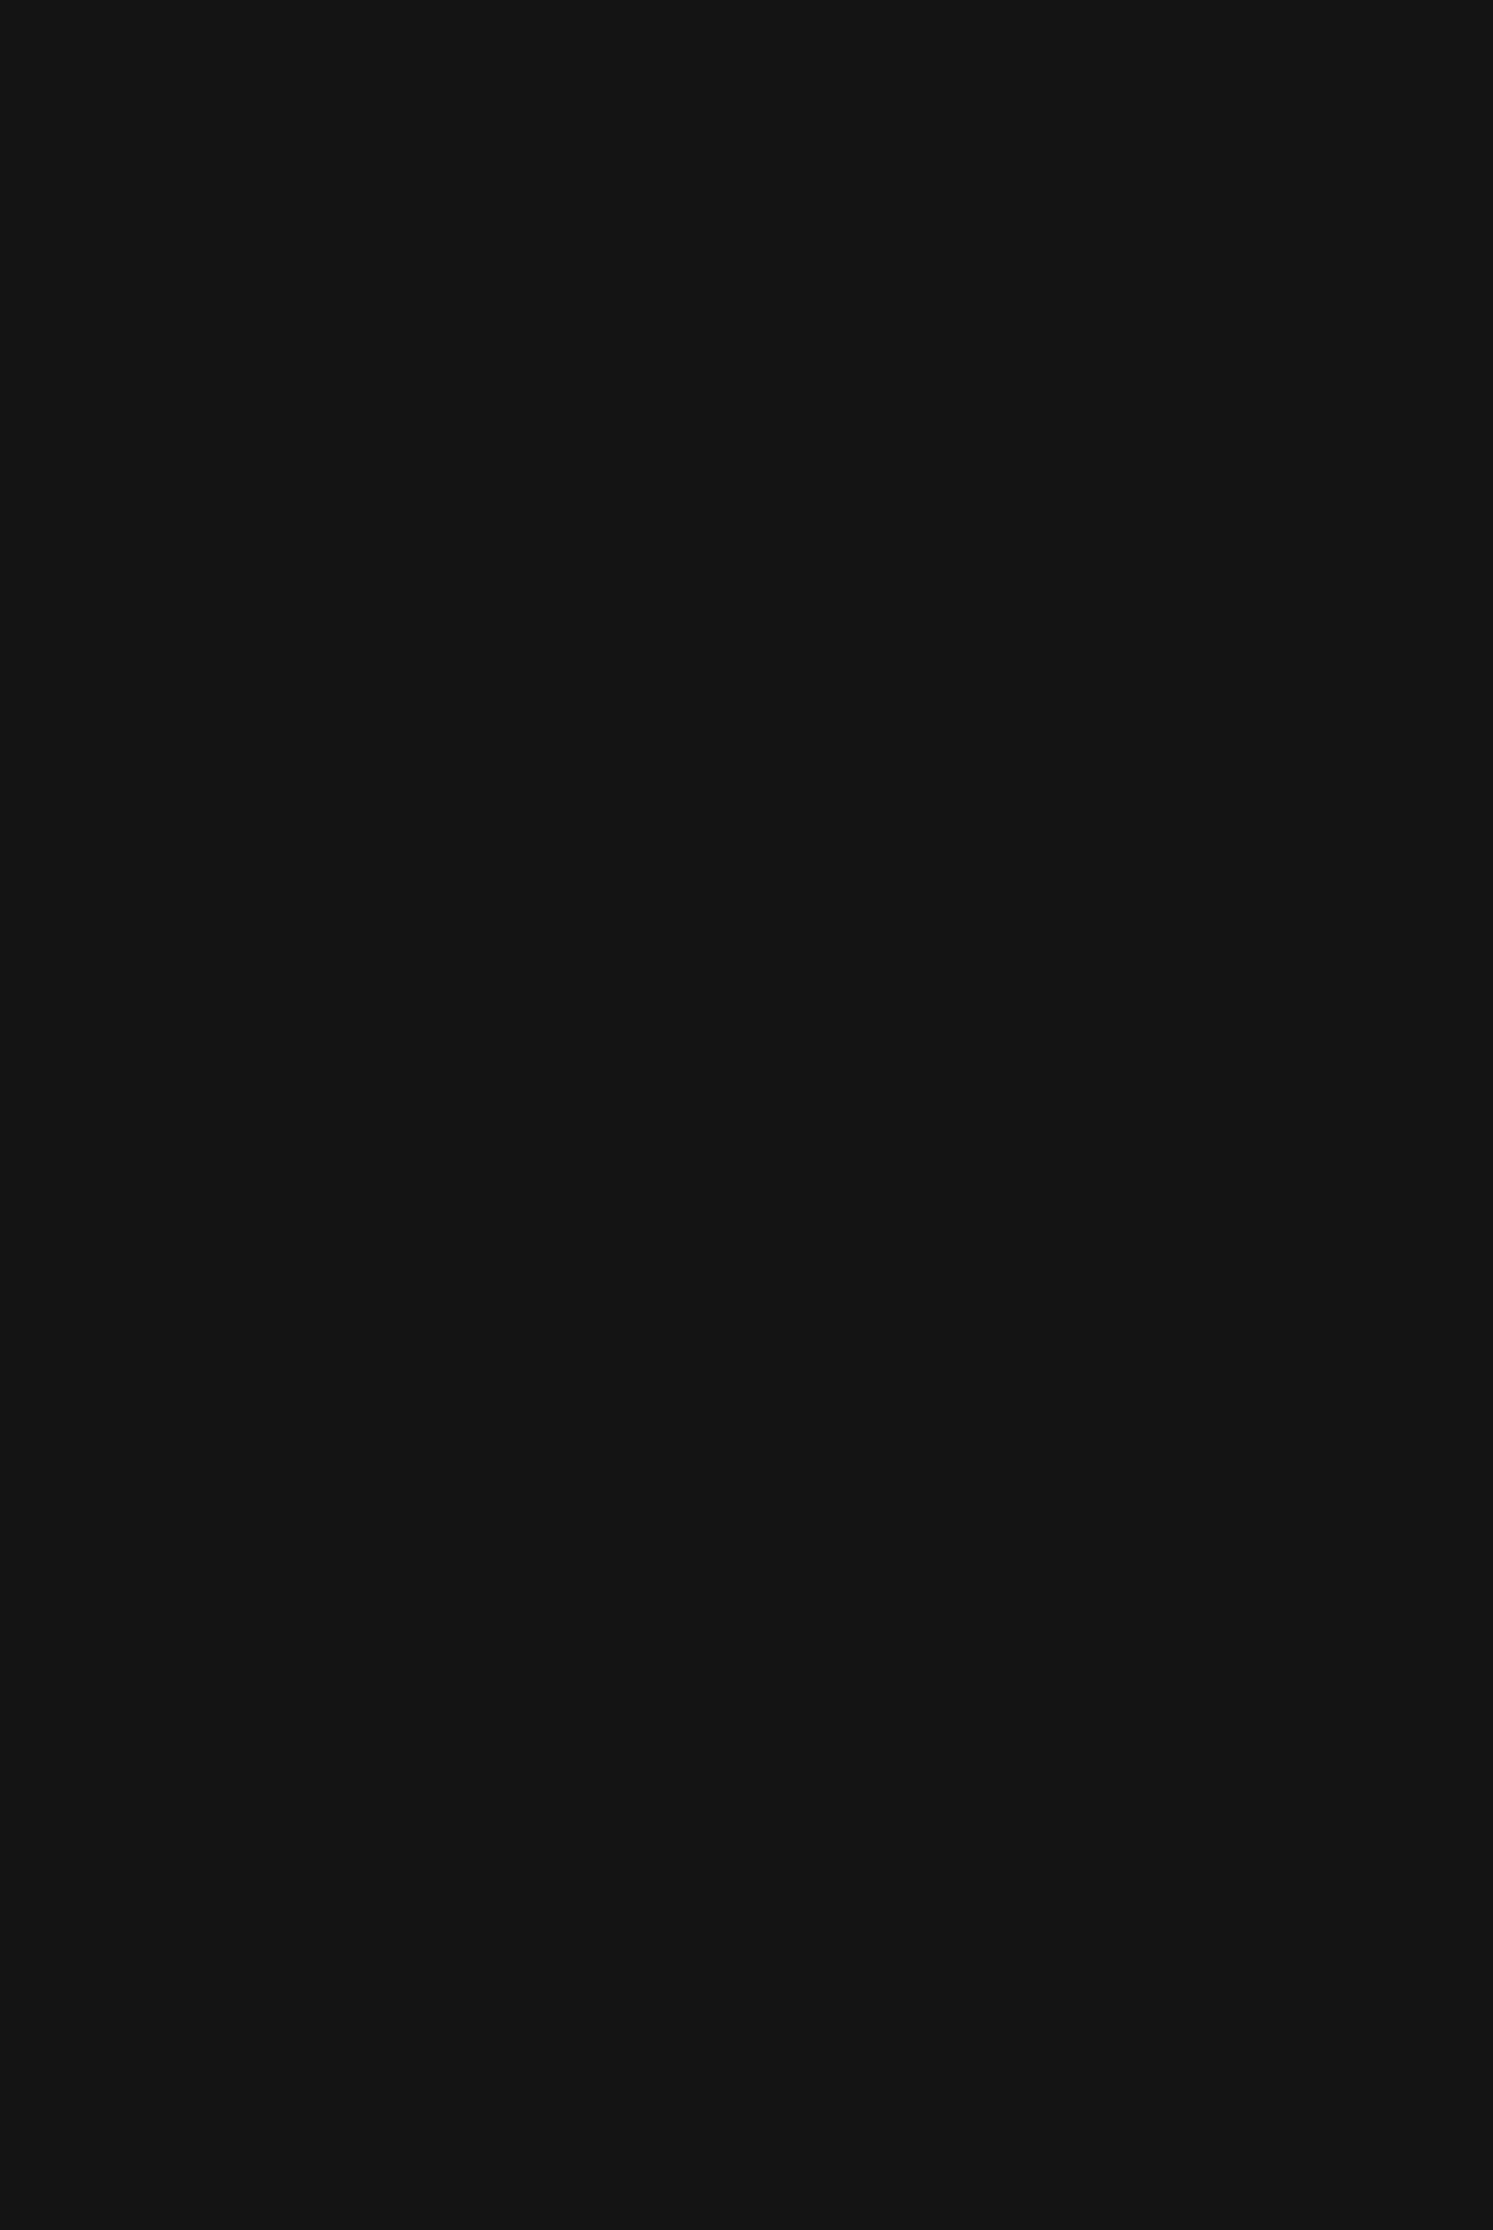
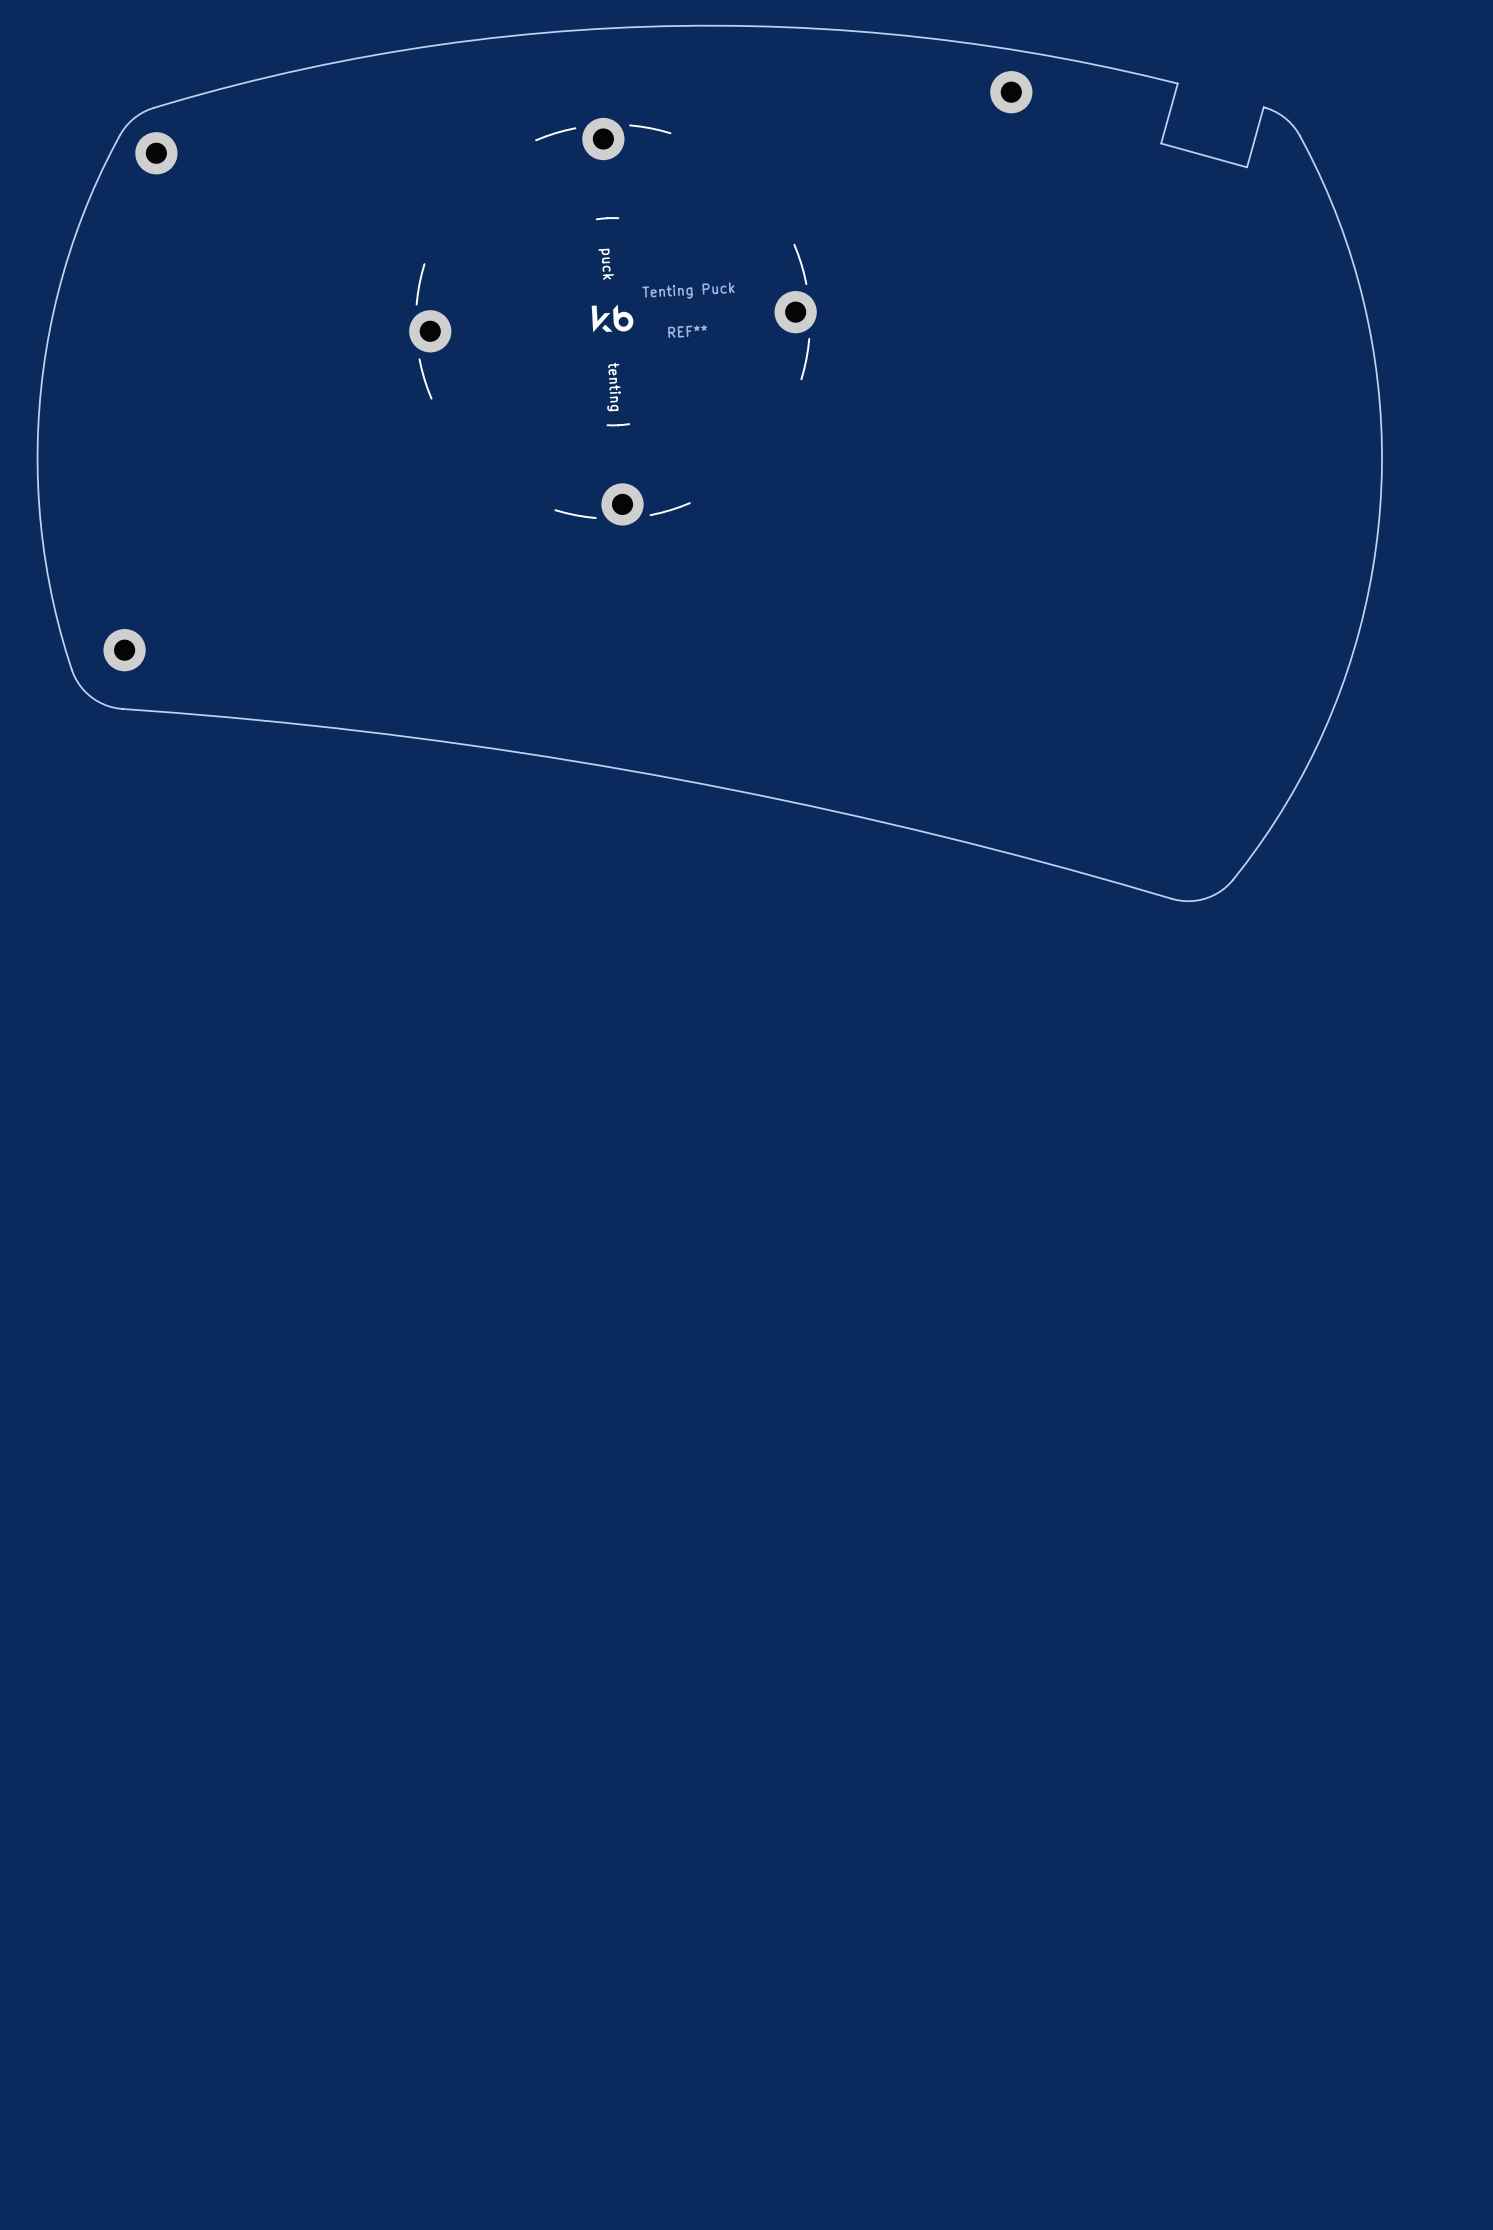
board edge: none -> (1177, 83) (1161, 143) (1247, 167) (1263, 107) (1285, 118) (1299, 135) (1335, 210) (1360, 290) (1373, 351) (1381, 434) (1380, 496) (1374, 559) (1362, 620) (1344, 680) (1320, 738) (1281, 811) (1233, 879) (1215, 894) (1194, 900) (1177, 900) (1017, 855) (913, 829) (757, 794) (599, 765) (441, 741) (335, 728) (116, 708) (100, 703) (91, 697) (76, 679) (55, 612) (41, 535) (37, 456) (42, 377) (56, 300) (79, 225) (93, 188) (119, 135) (129, 122) (143, 112) (253, 80) (389, 52) (526, 34) (664, 26) (767, 26) (905, 35) (1042, 54) (1177, 83)
part: none -> (1011, 92)
part: none -> (156, 153)
REF**: none -> Tenting Puck (612, 321)
part: none -> (124, 650)

